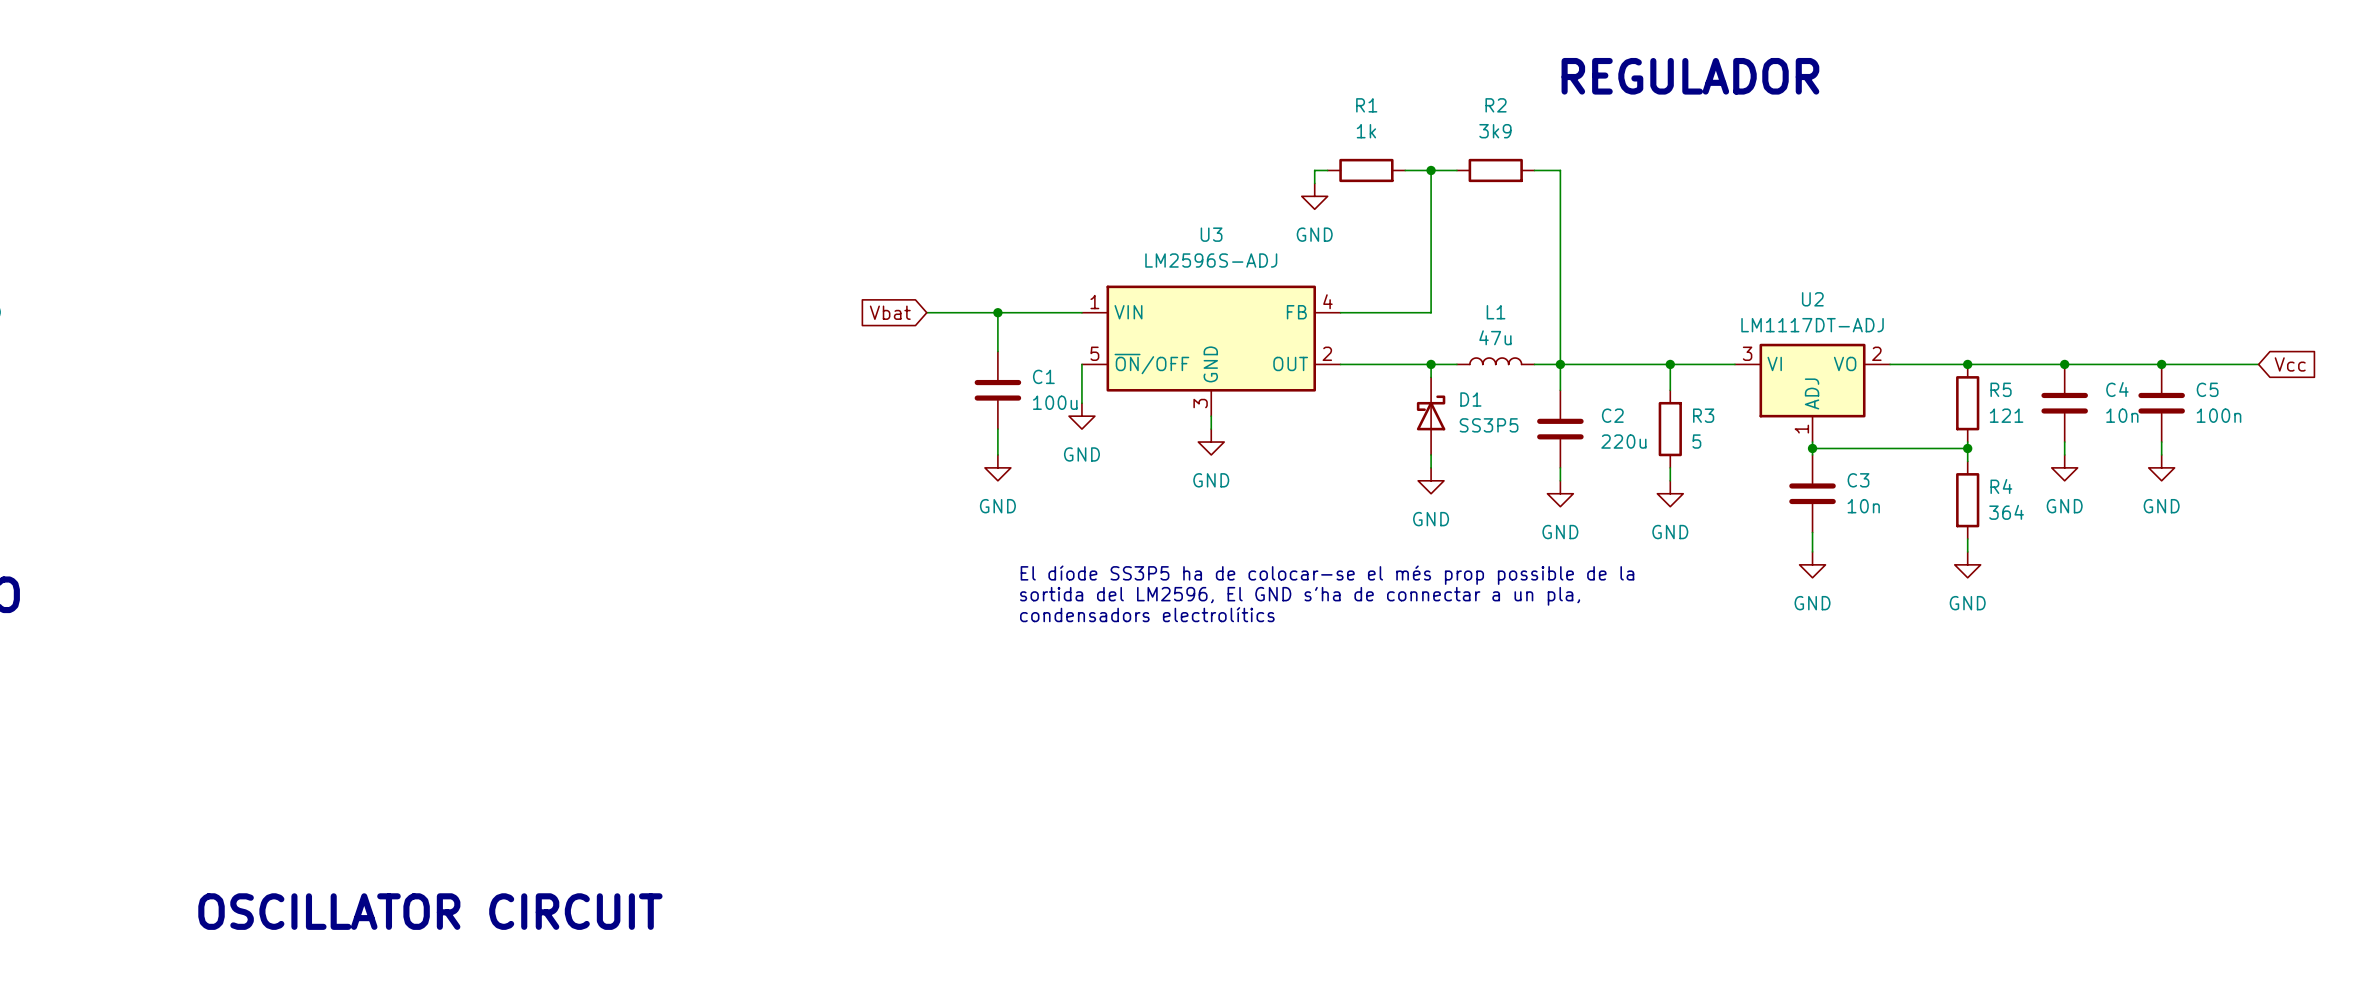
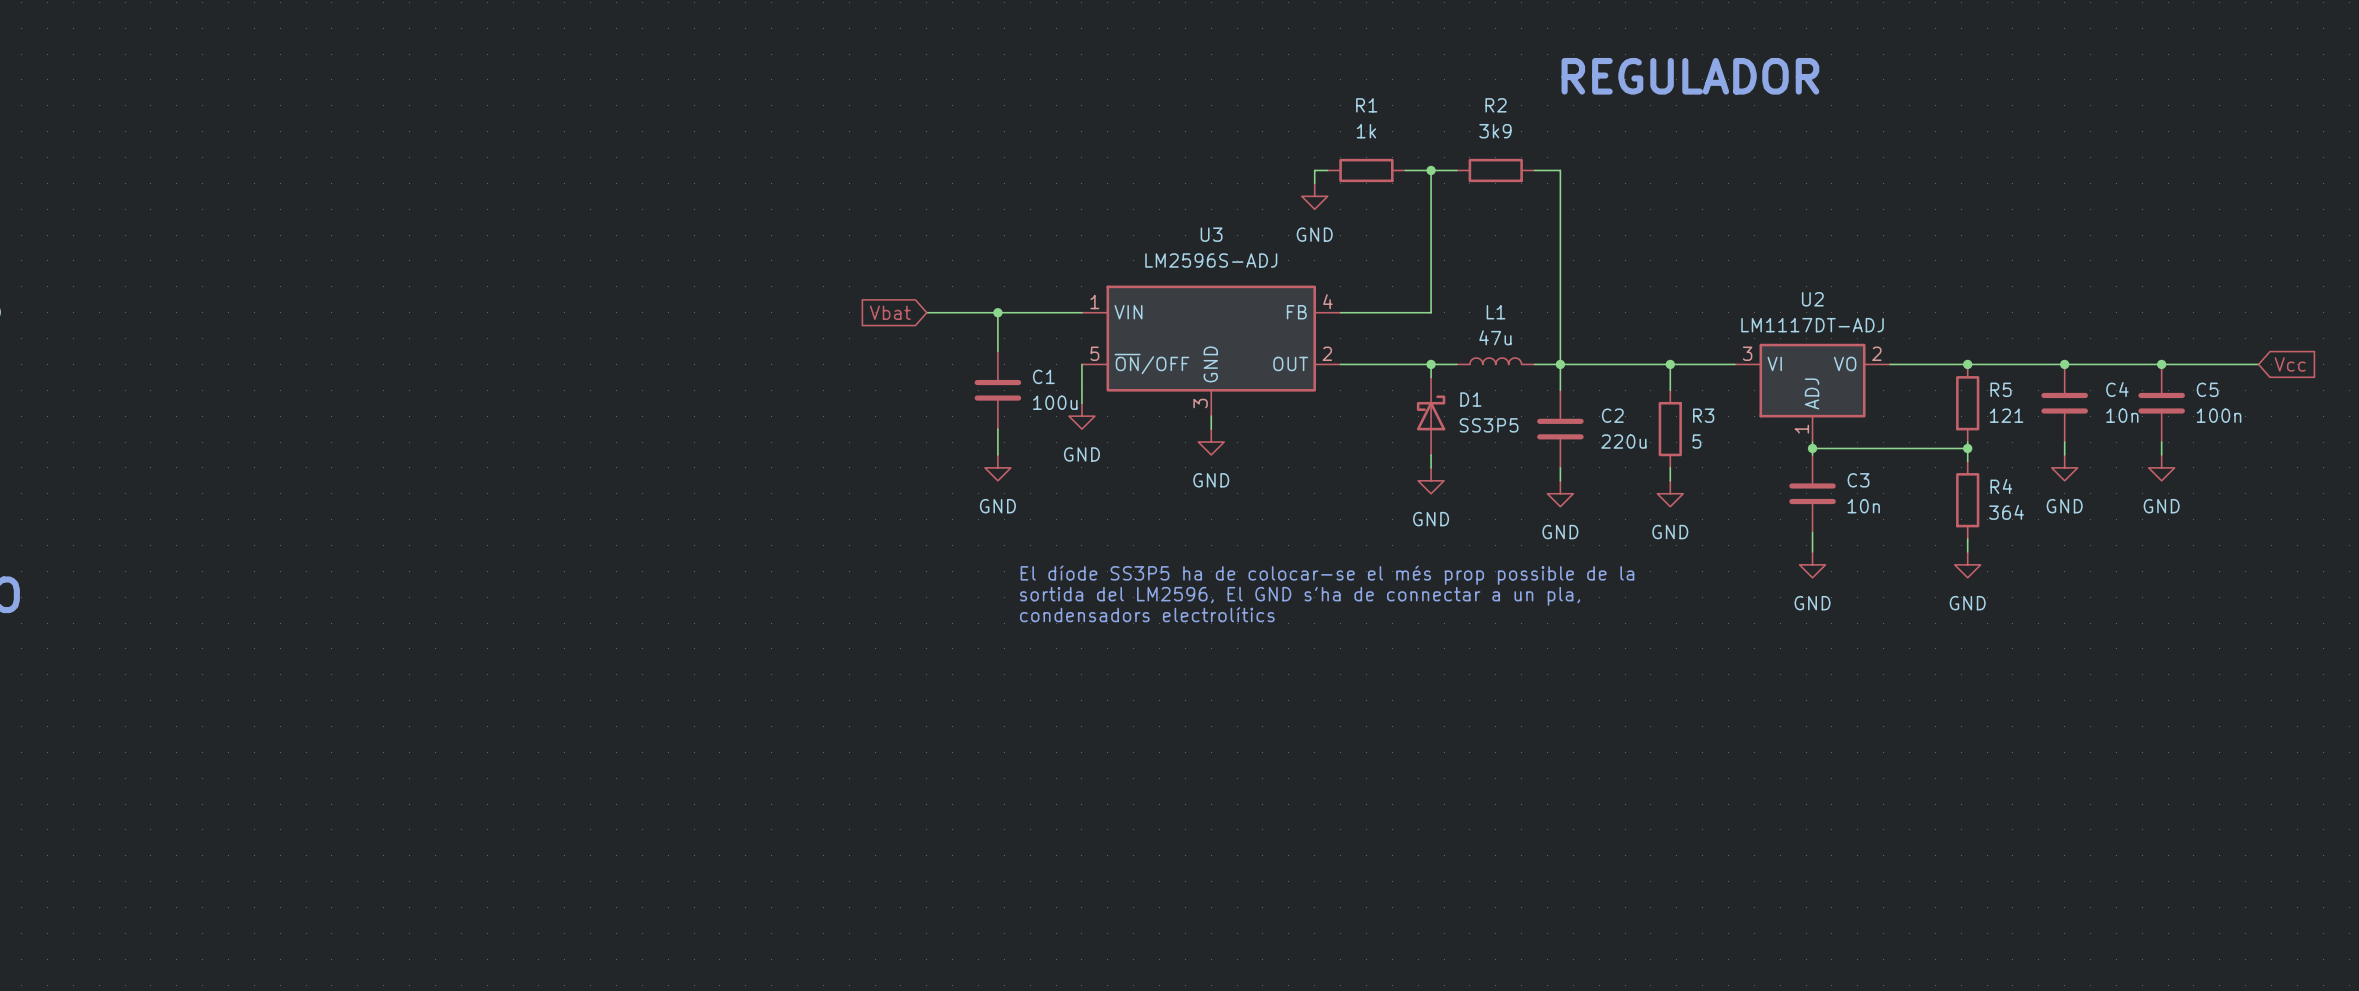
text: OSCILLATOR CIRCUIT (430, 911) -> none

